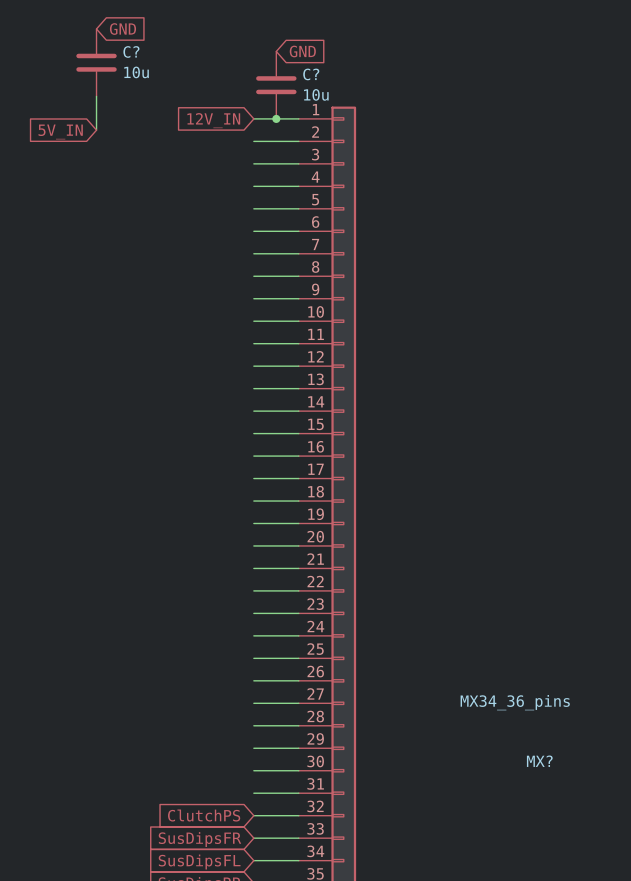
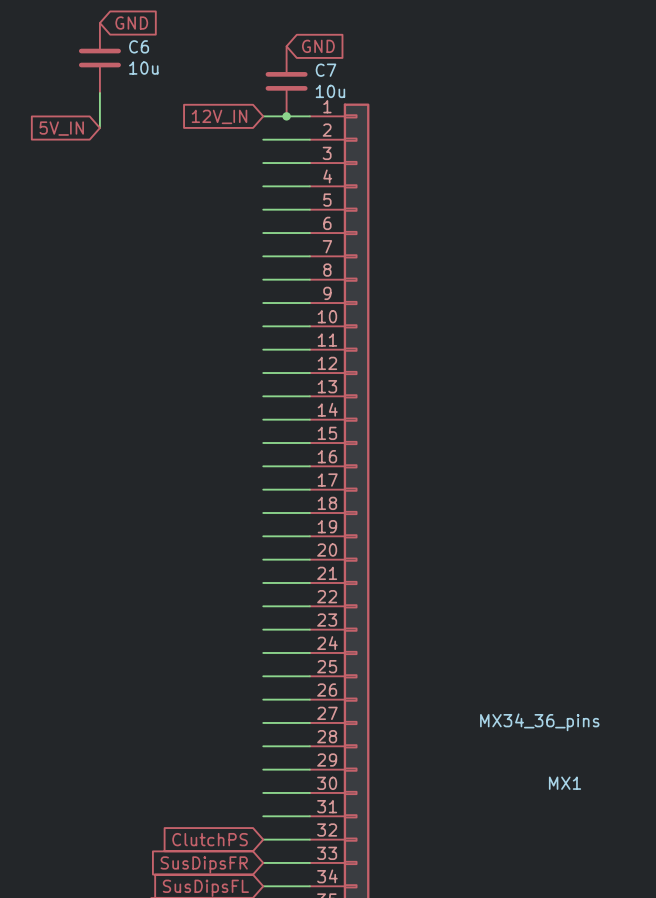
C? name: C? (131, 51) -> C6 (139, 46)
C? name: C? (311, 74) -> C7 (326, 70)
MX? name: MX? (539, 761) -> MX1 (565, 783)

